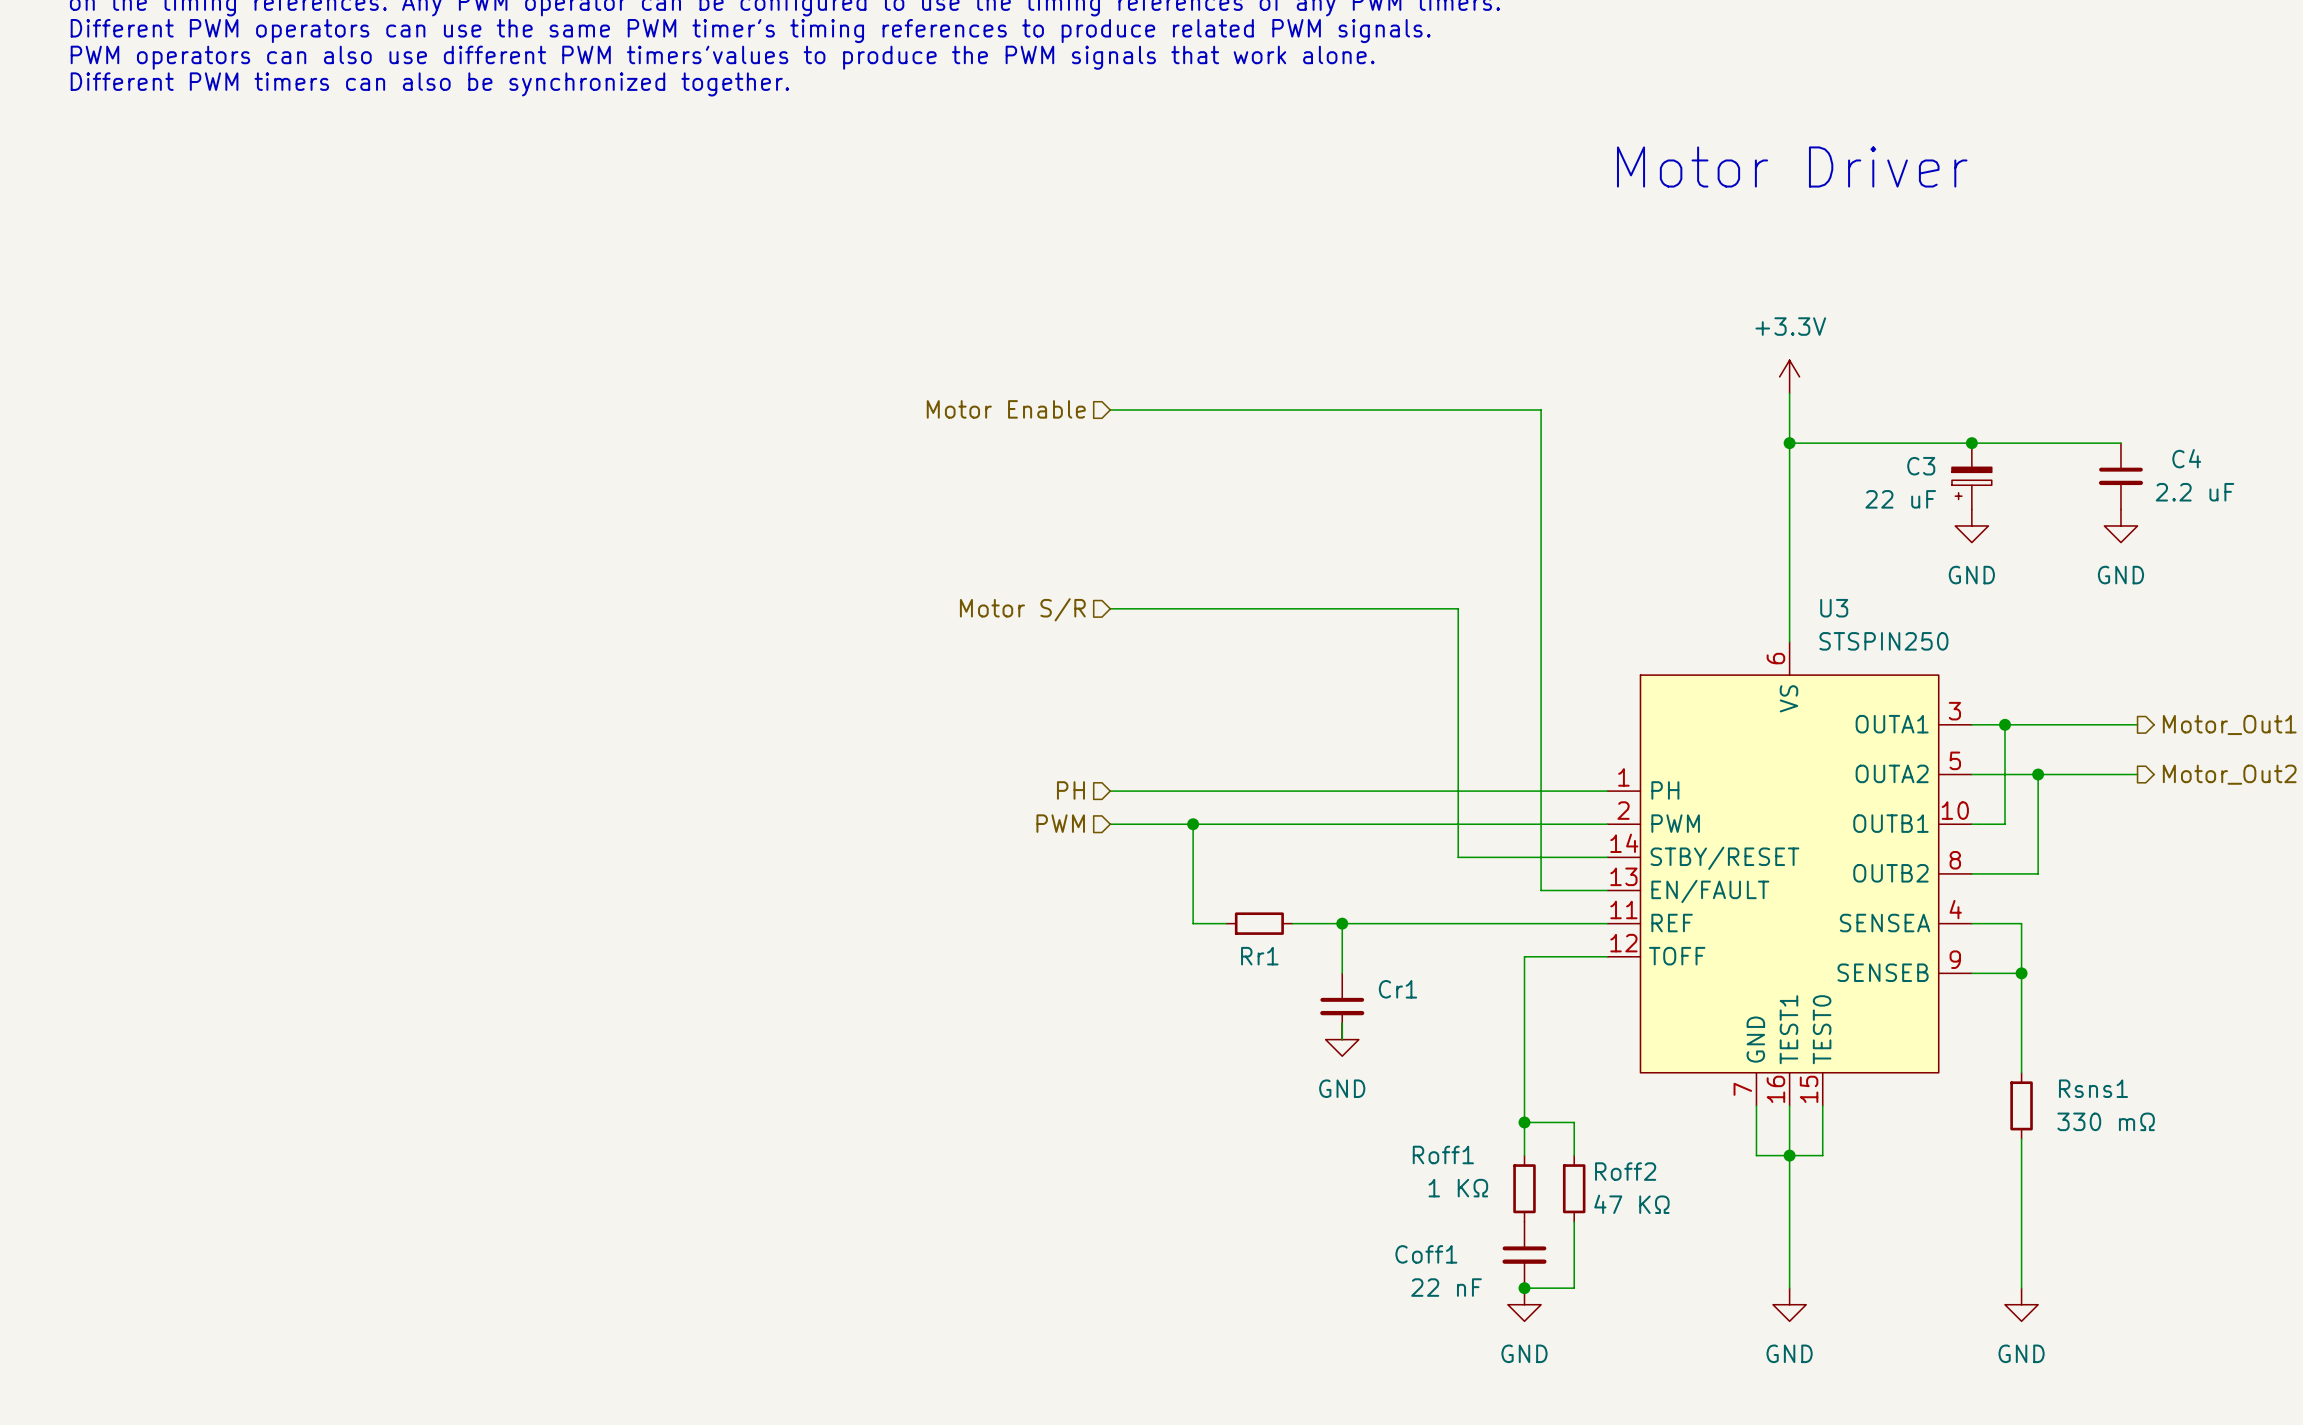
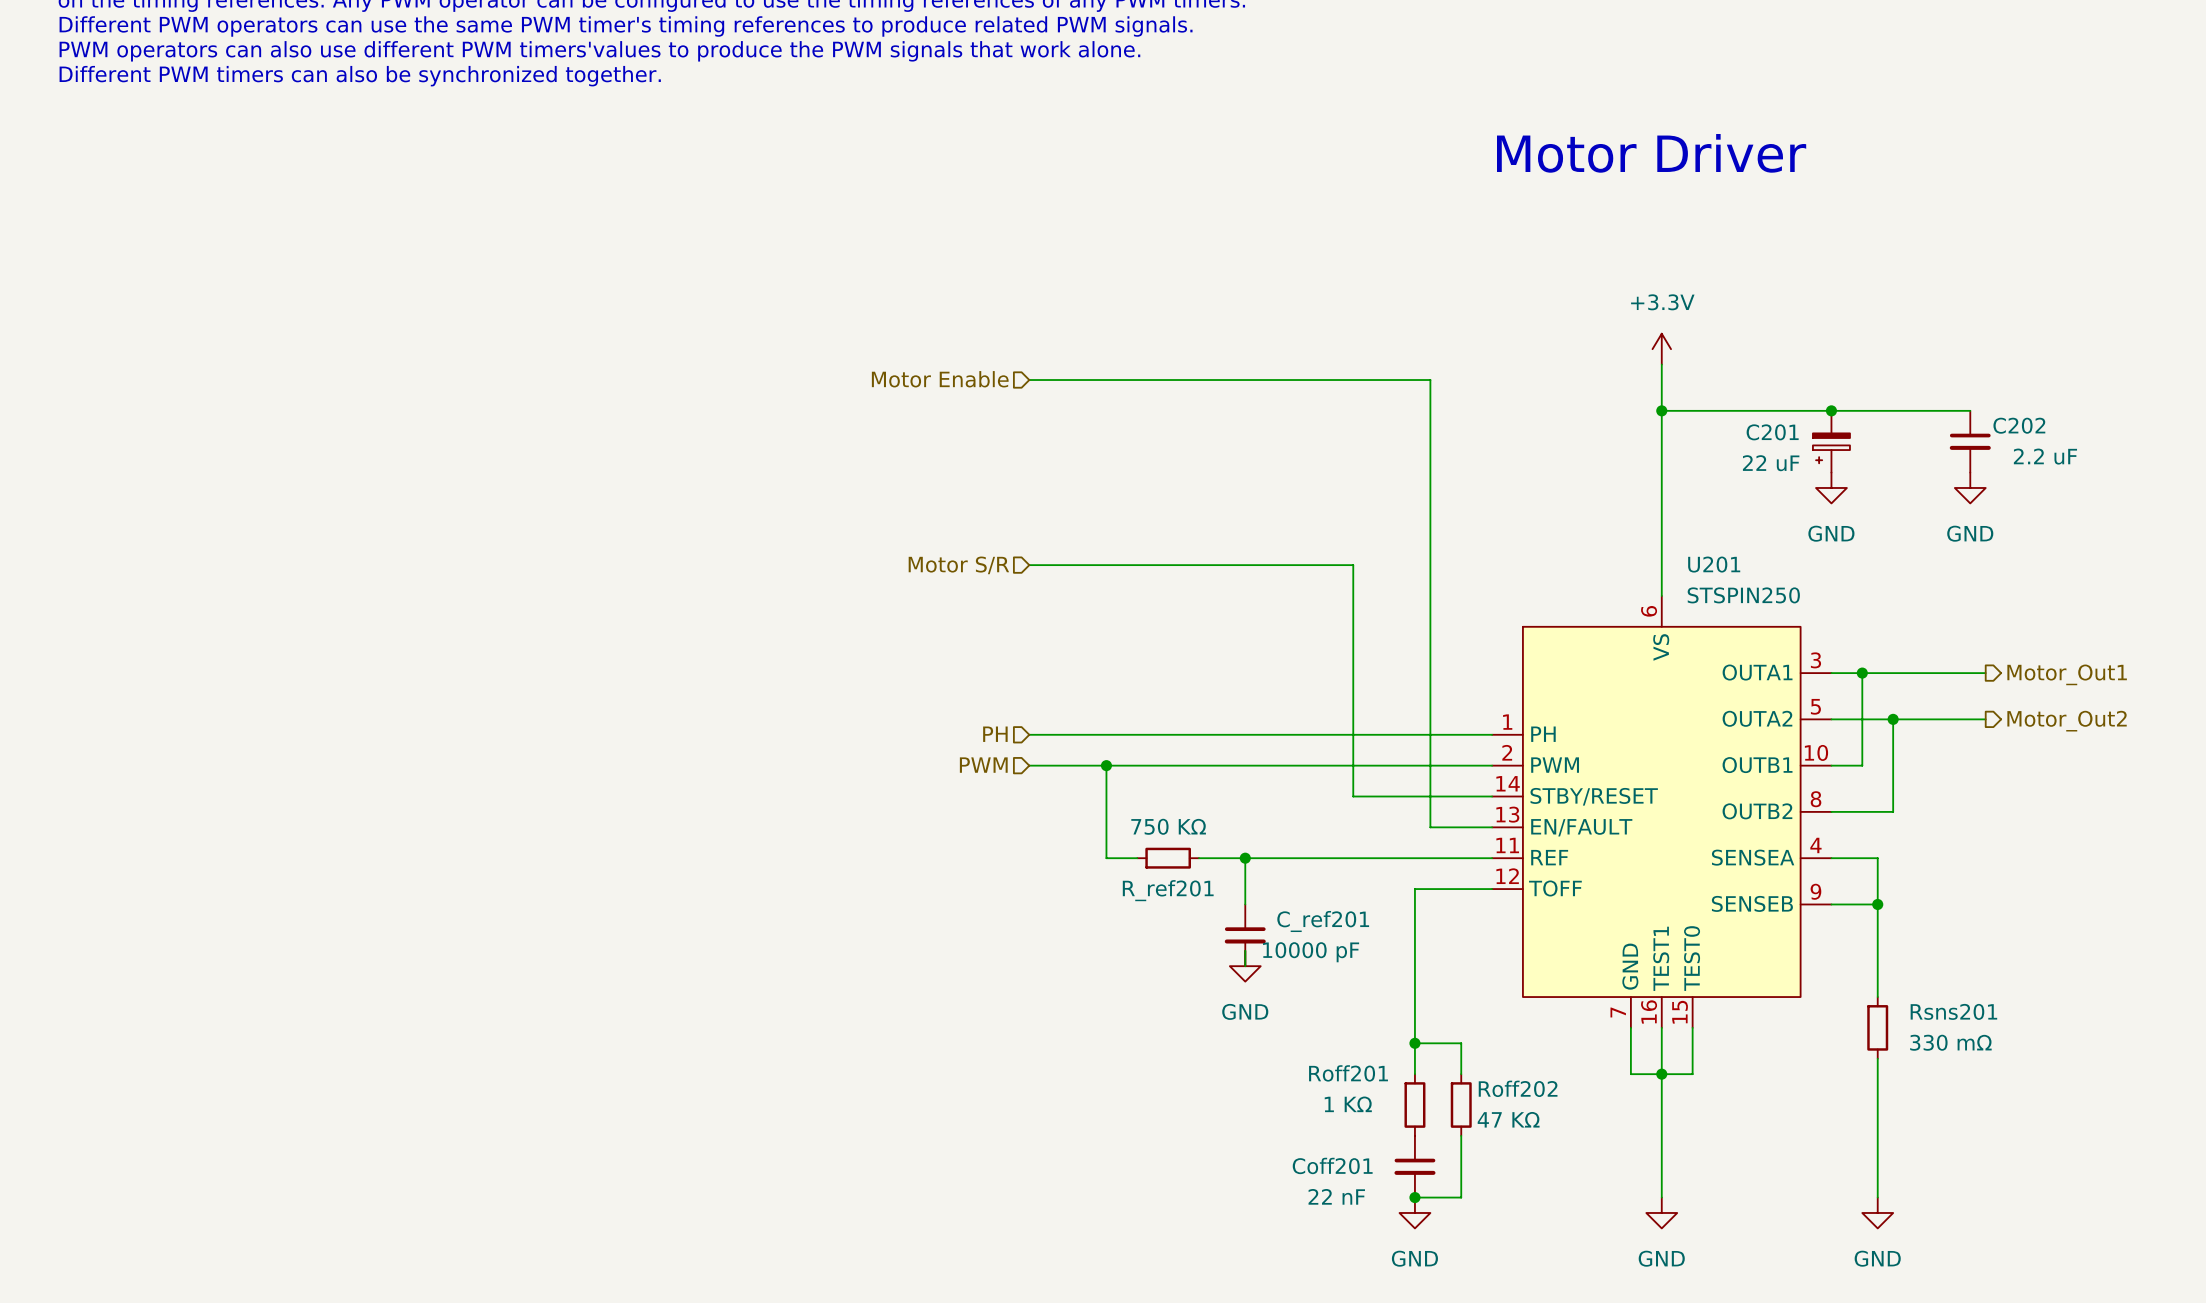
C4 name: C4 (2186, 458) -> C202 (2019, 425)
C3 name: C3 (1921, 466) -> C201 (1772, 432)
U3 name: U3 (1834, 608) -> U201 (1714, 564)
Rr1 value: none -> 750 KΩ (1168, 826)
Rr1 name: Rr1 (1259, 956) -> R_ref201 (1168, 890)
Cr1 name: Cr1 (1397, 989) -> C_ref201 (1323, 921)
Cr1 value: none -> 10000 pF (1311, 952)
Rsns1 name: Rsns1 (2093, 1088) -> Rsns201 (1953, 1011)
Roff1 name: Roff1 (1443, 1154) -> Roff201 (1348, 1073)
Roff2 name: Roff2 (1625, 1171) -> Roff202 (1518, 1088)
Coff1 name: Coff1 (1426, 1254) -> Coff201 (1332, 1165)

